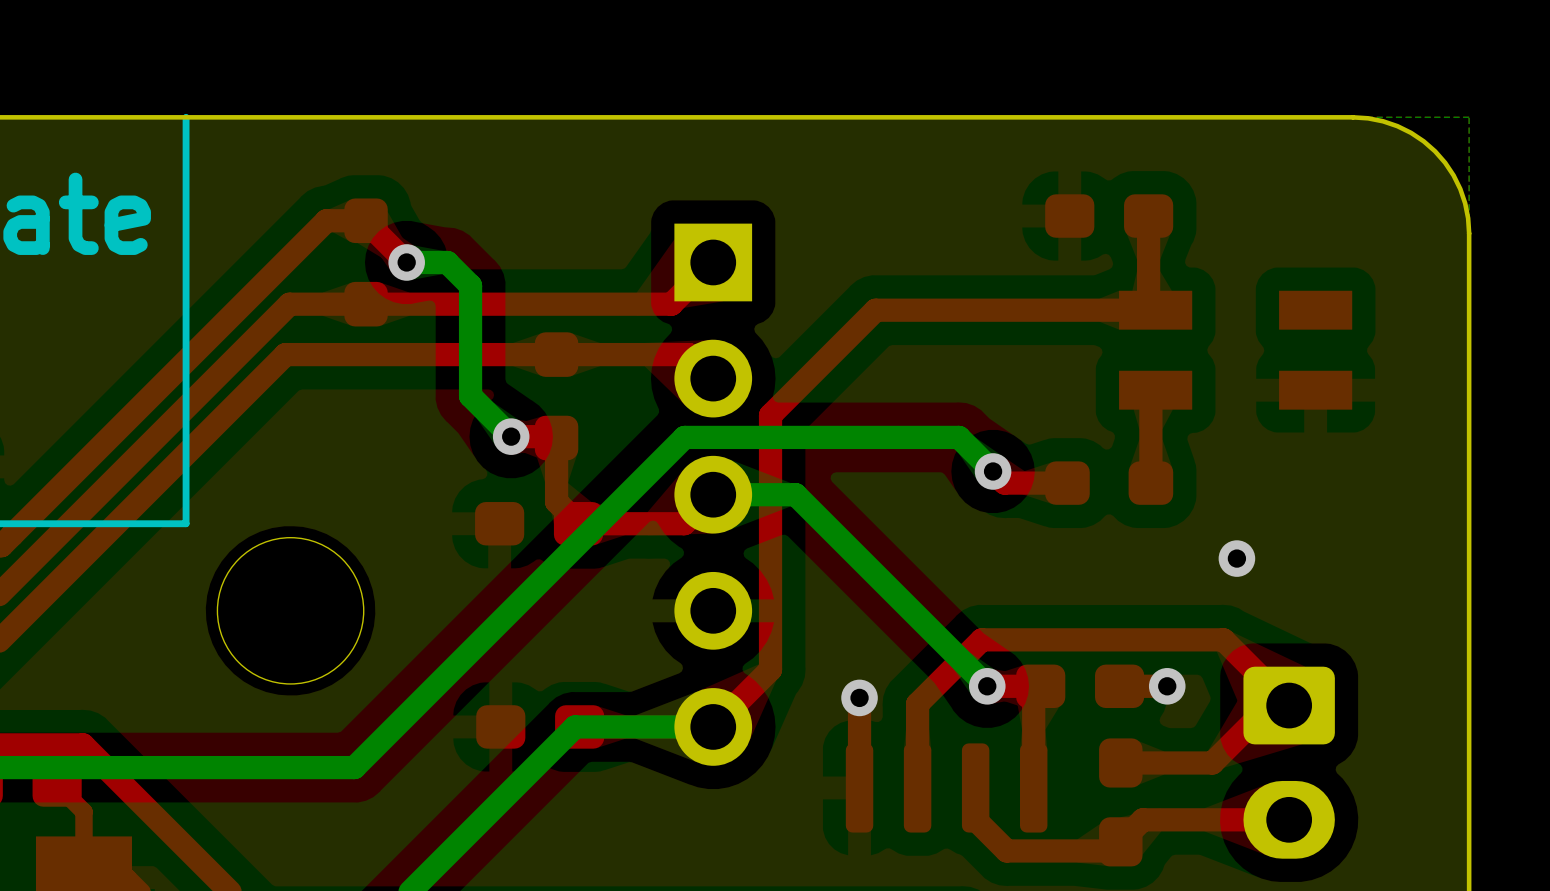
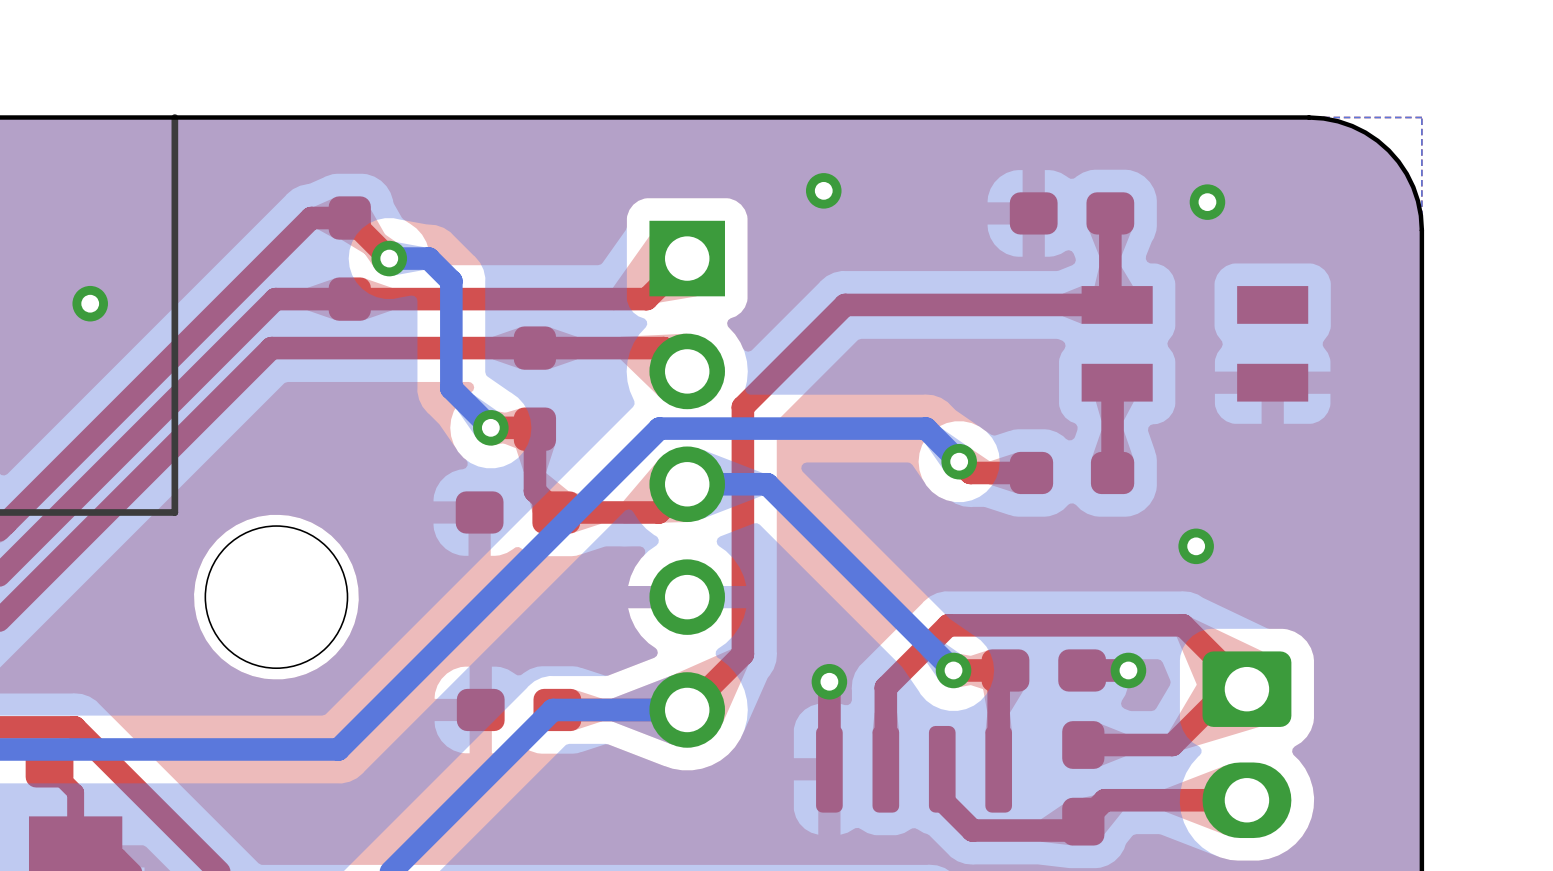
via: none -> (823, 190)
via: none -> (1207, 202)
via: none -> (90, 303)

